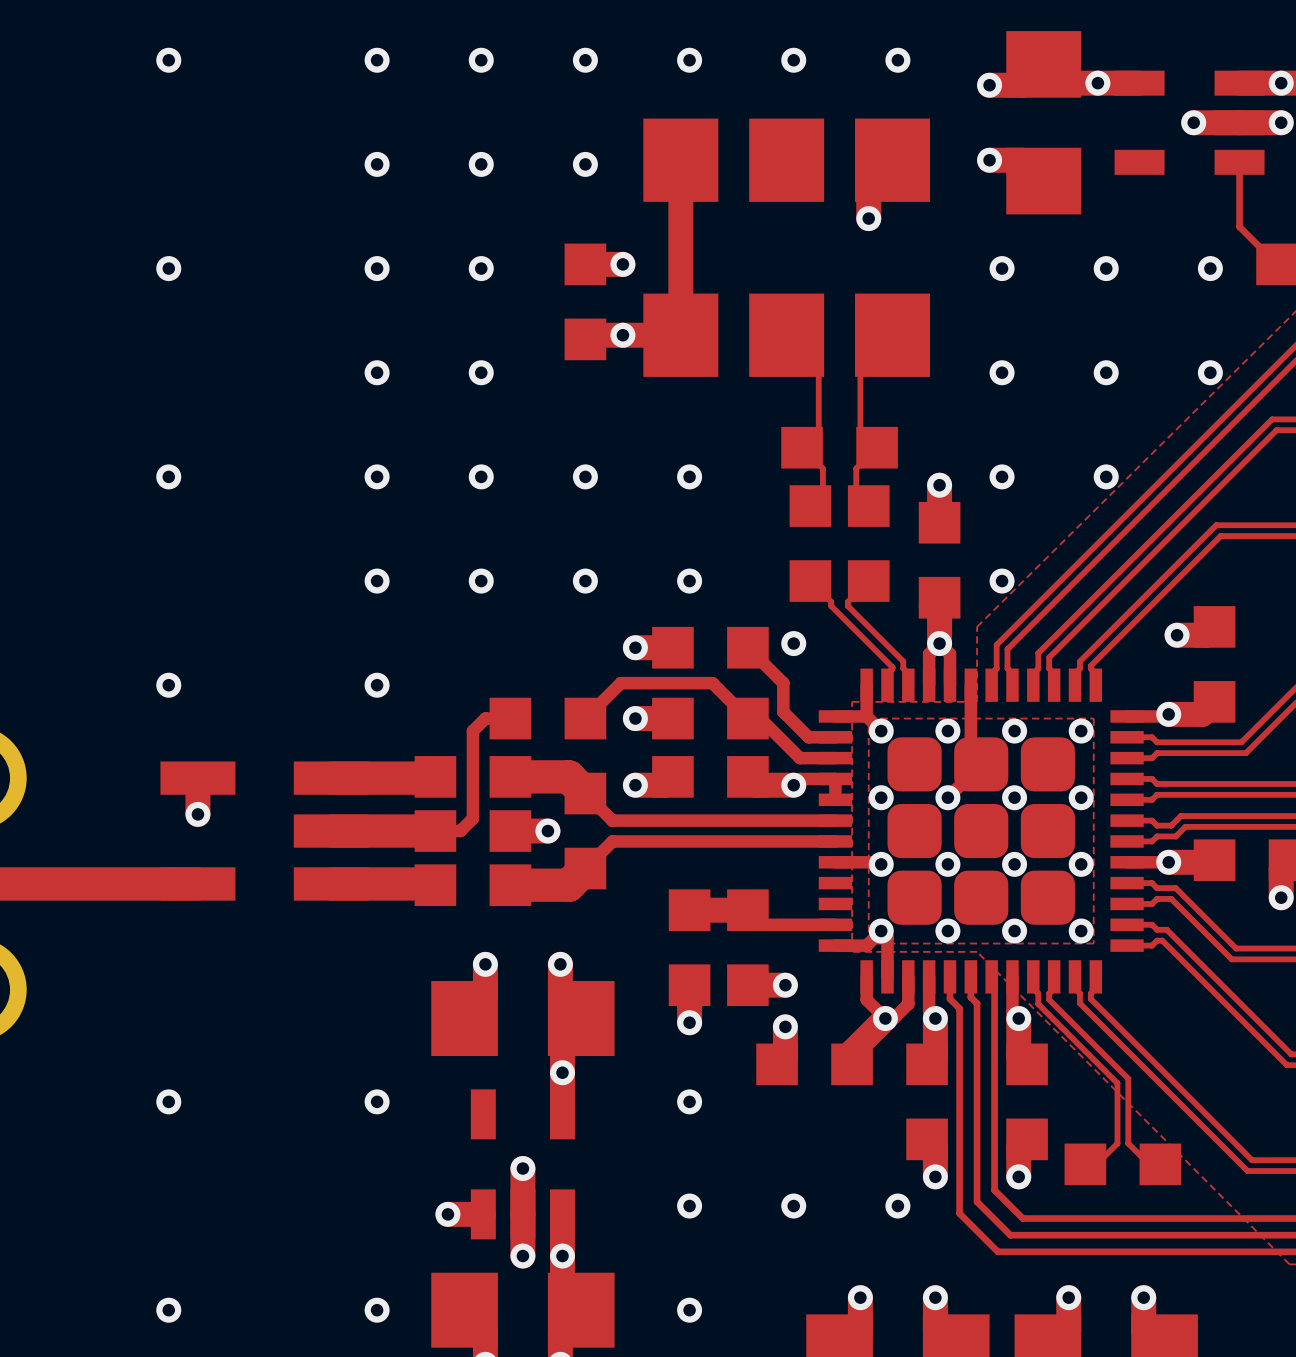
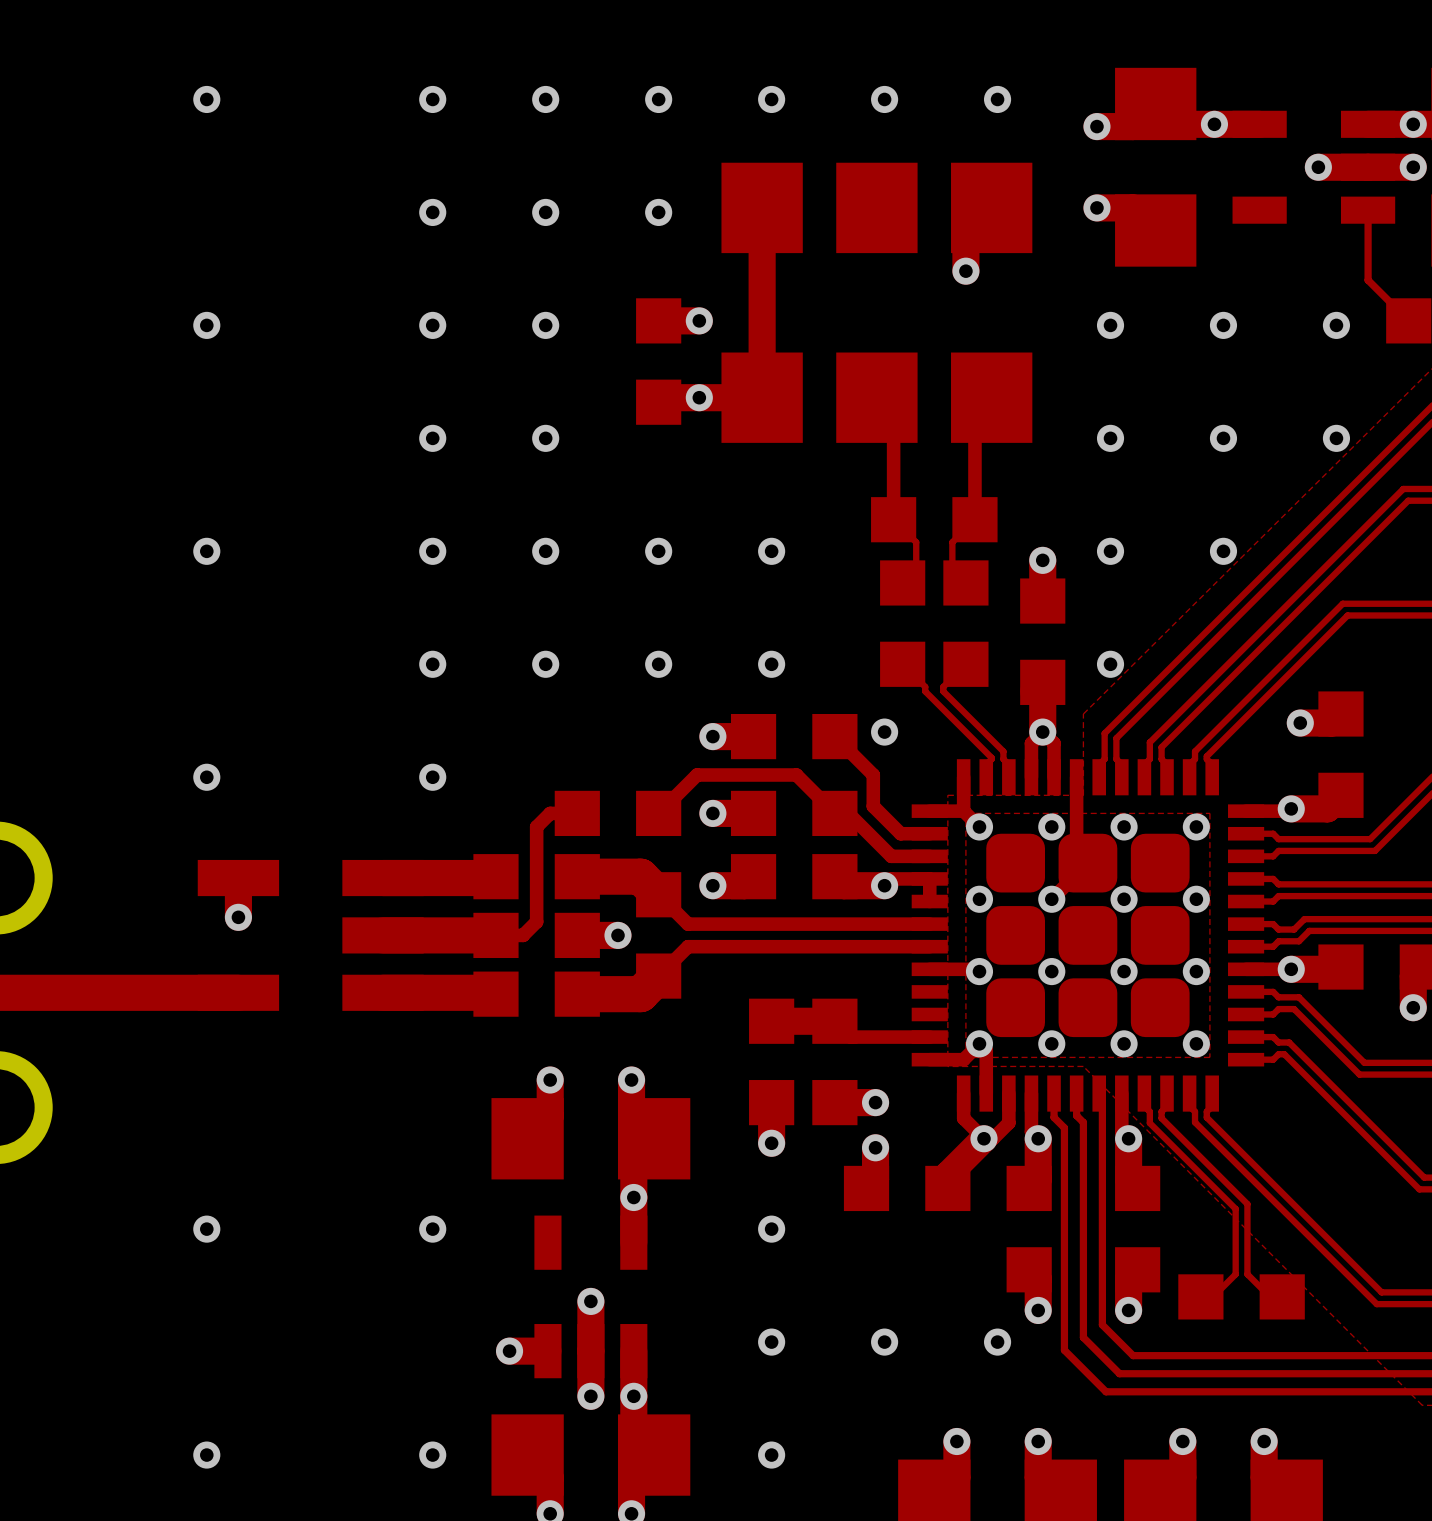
top track: (802, 350) (818, 367) (818, 431) (802, 447) -> (893, 414) (893, 519)
top track: (877, 350) (860, 367) (860, 431) (877, 447) -> (974, 414) (974, 519)

